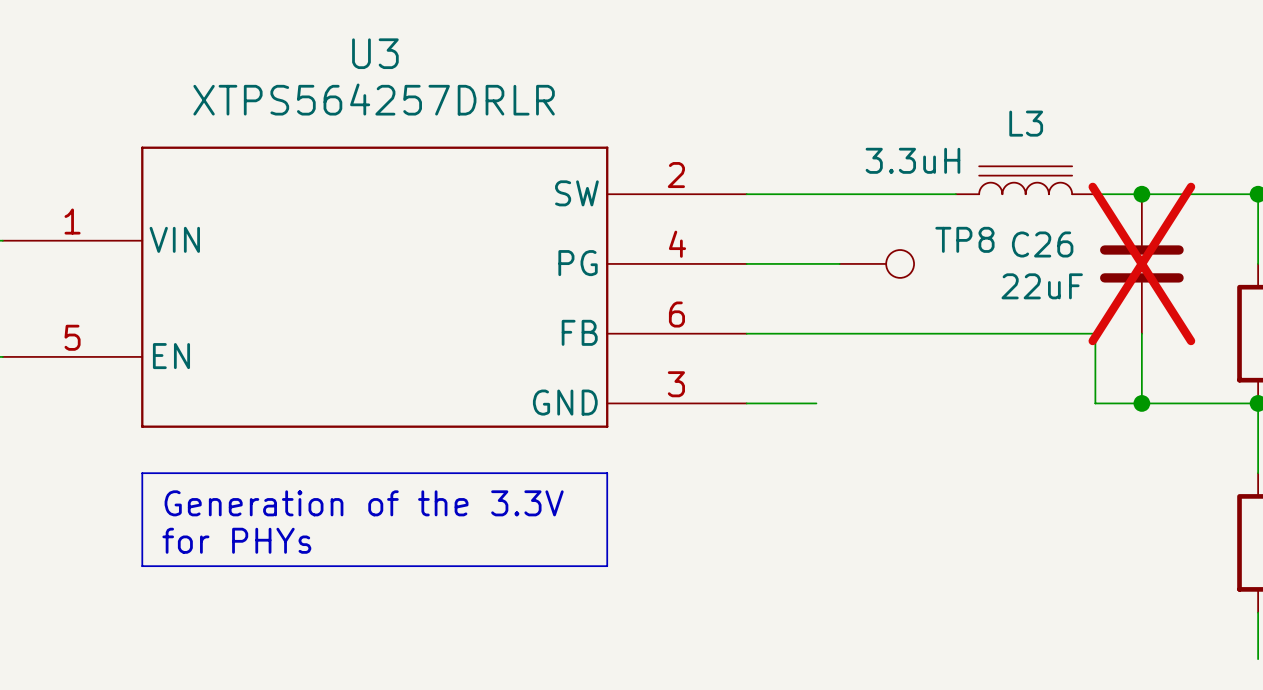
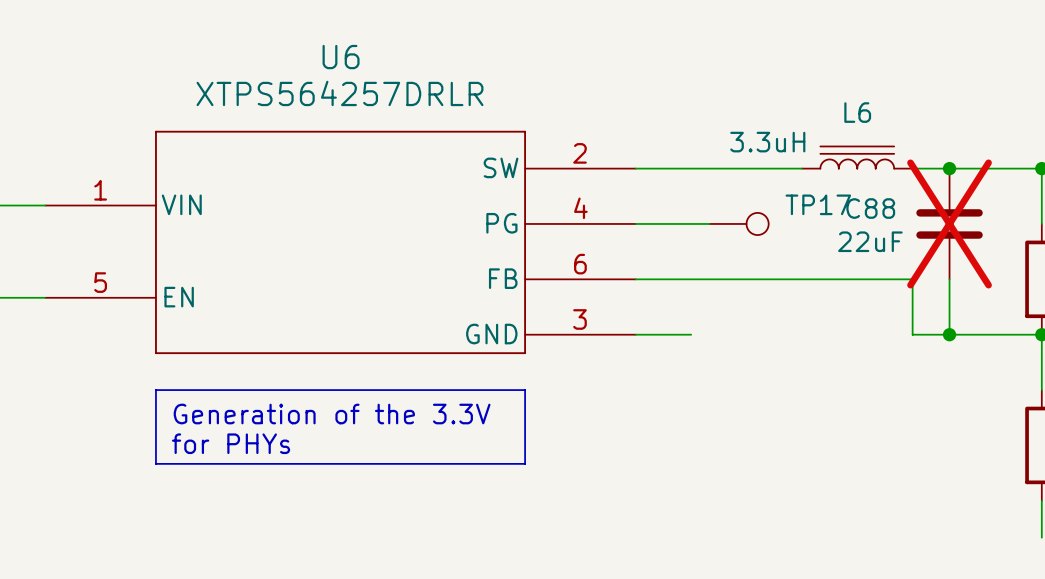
U3 name: U3 (375, 53) -> U6 (341, 57)
L3 name: L3 (1026, 123) -> L6 (857, 112)
TP8 name: TP8 (964, 239) -> TP17 (818, 204)
C26 name: C26 (1042, 244) -> C88 (870, 208)

